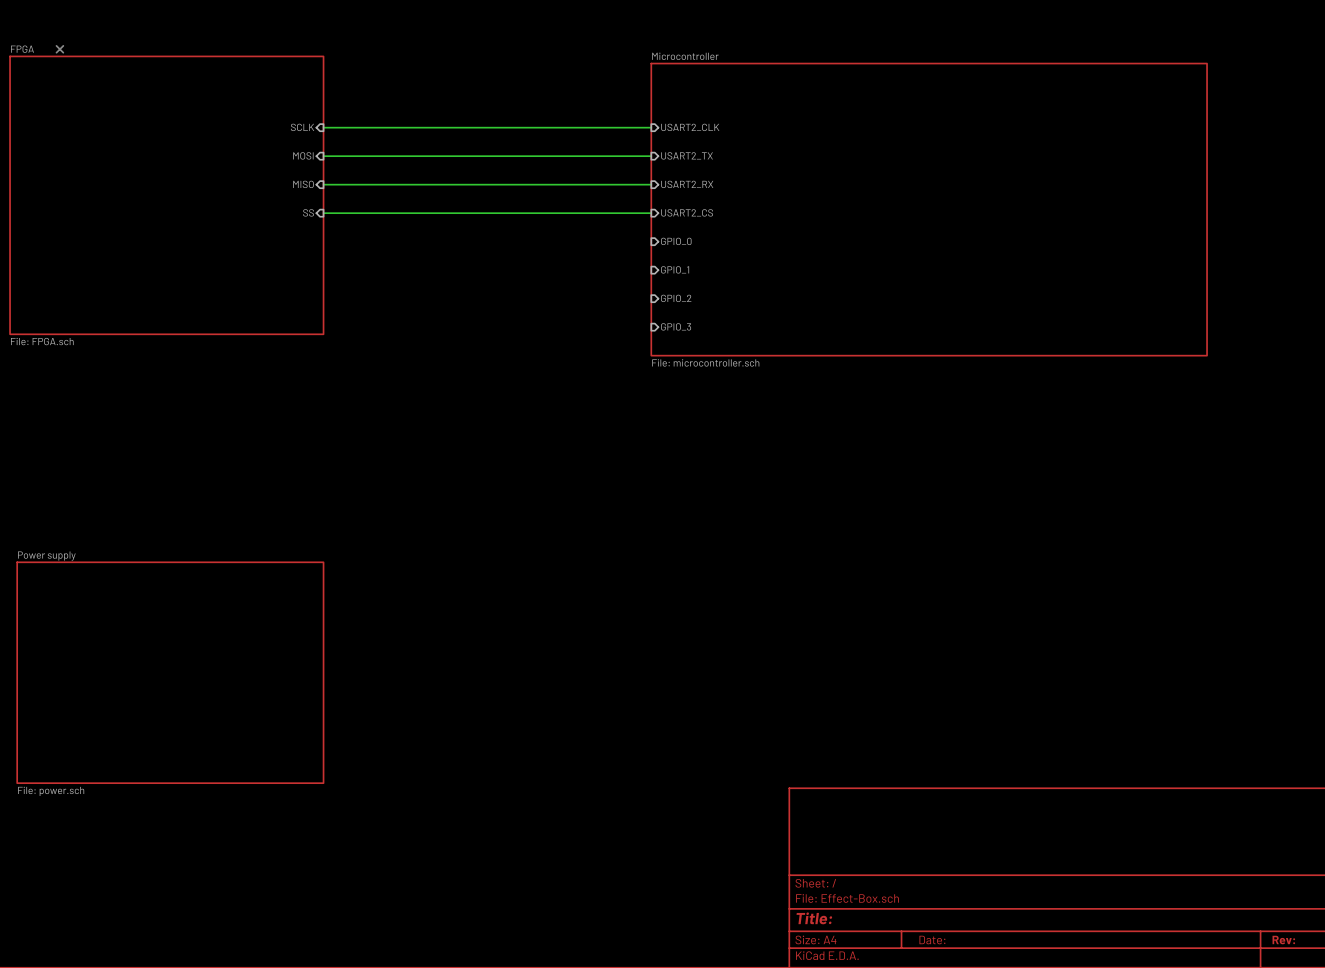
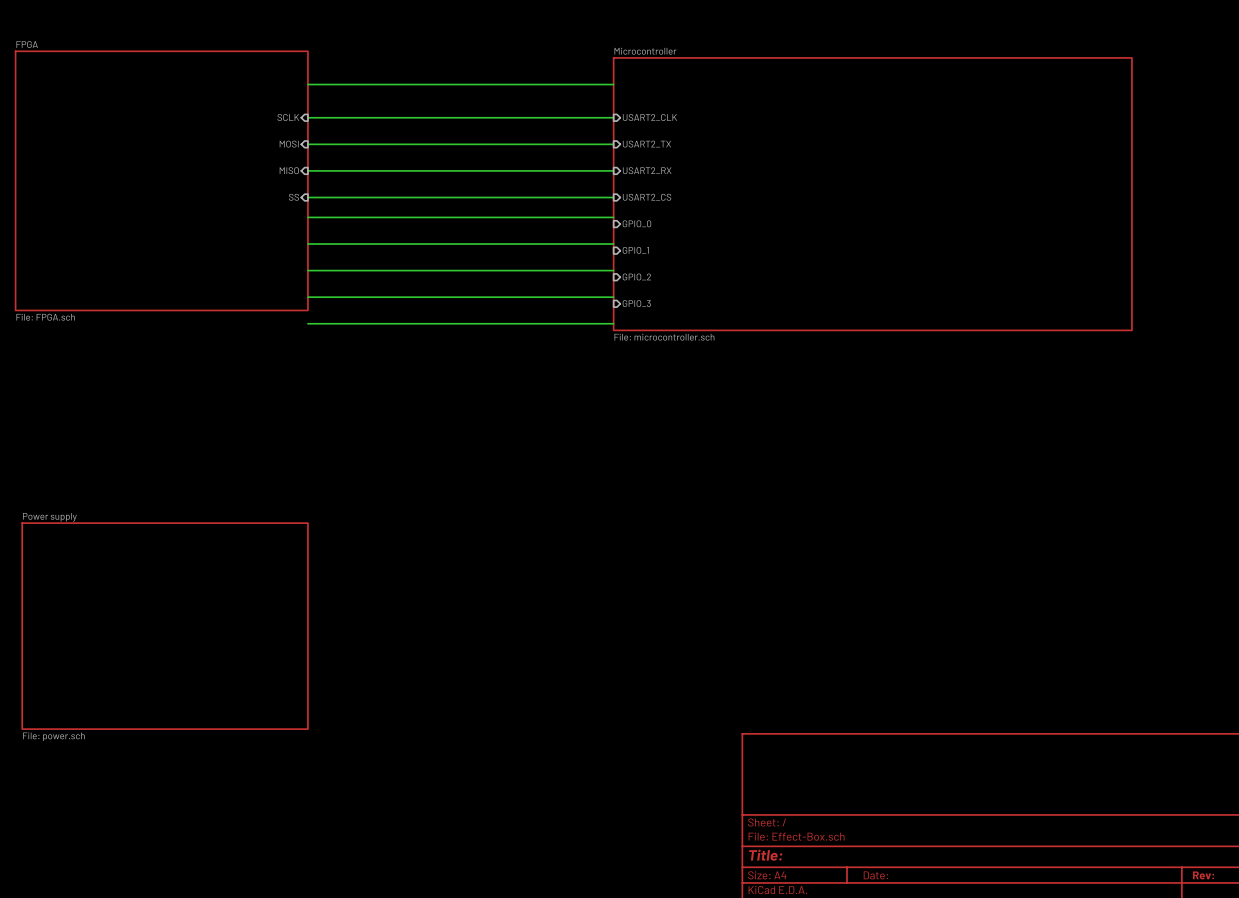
no-connect mark: (59, 49) -> none
wire: none -> (307, 84) (613, 84)
wire: none -> (307, 217) (613, 217)
wire: none -> (307, 244) (613, 244)
wire: none -> (307, 270) (613, 270)
wire: none -> (307, 297) (613, 297)
wire: none -> (307, 323) (613, 323)

